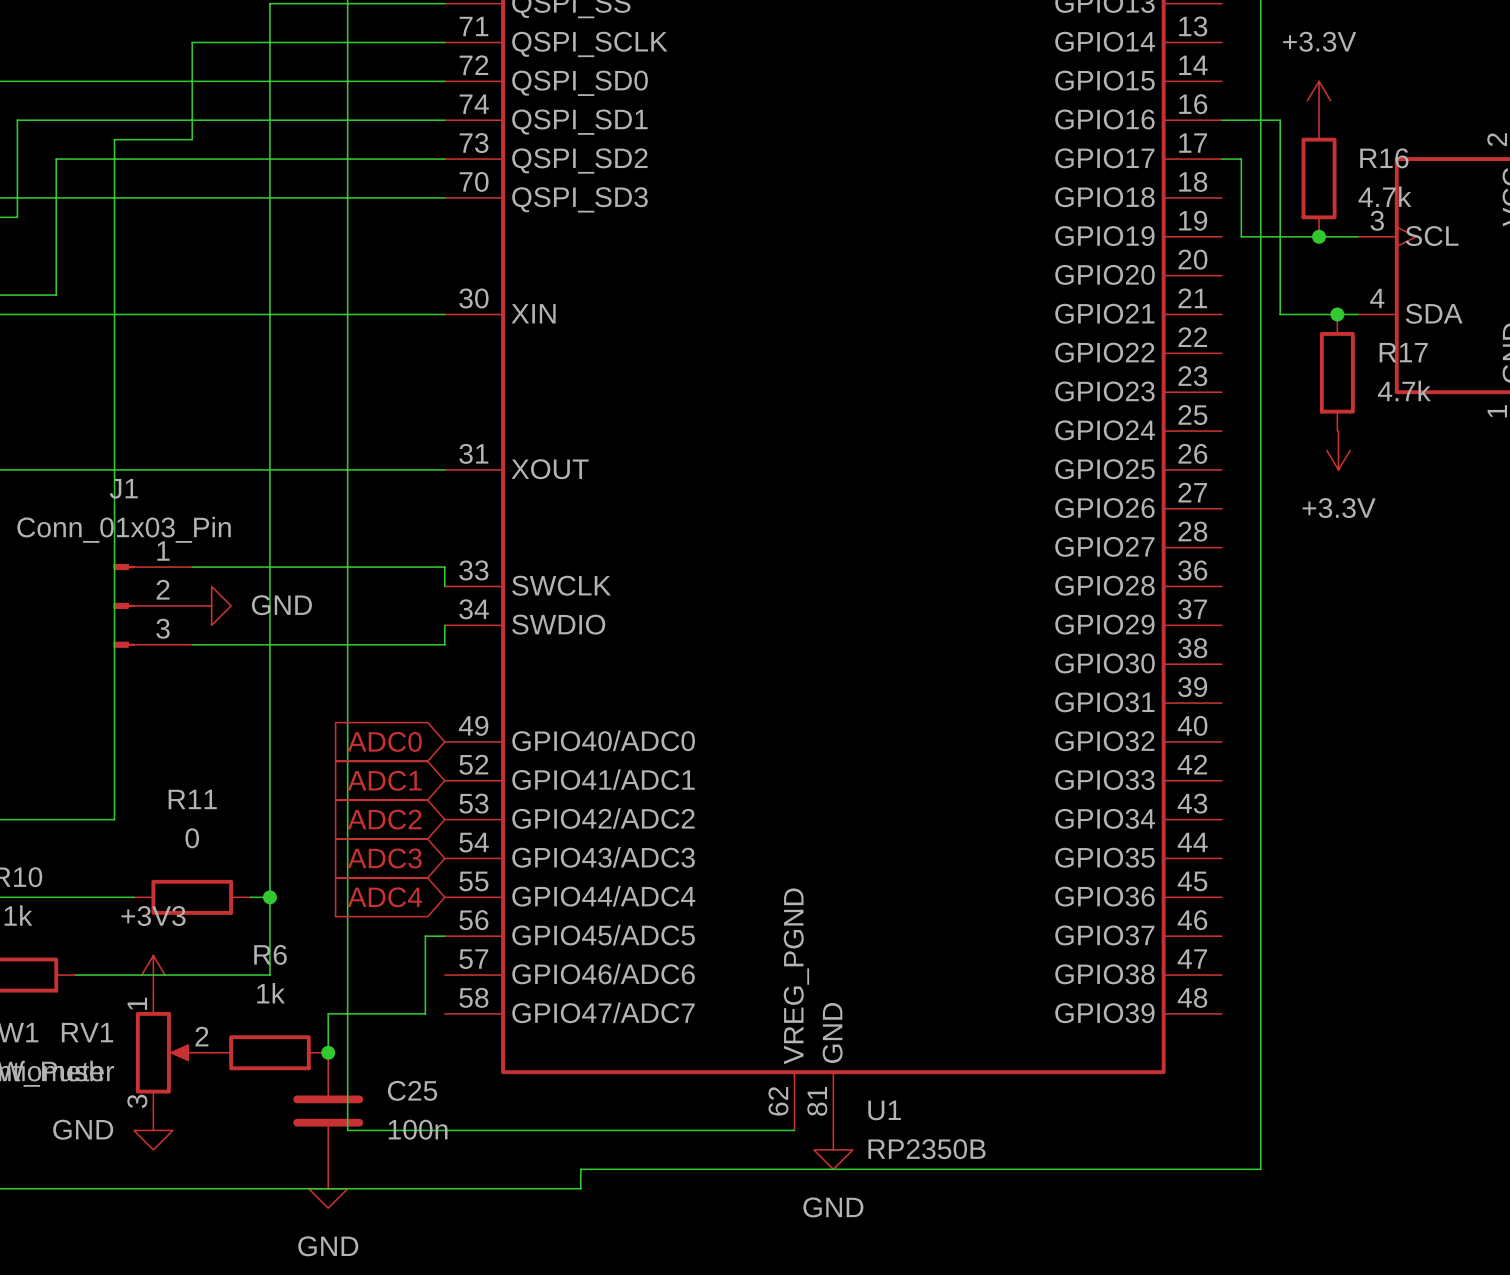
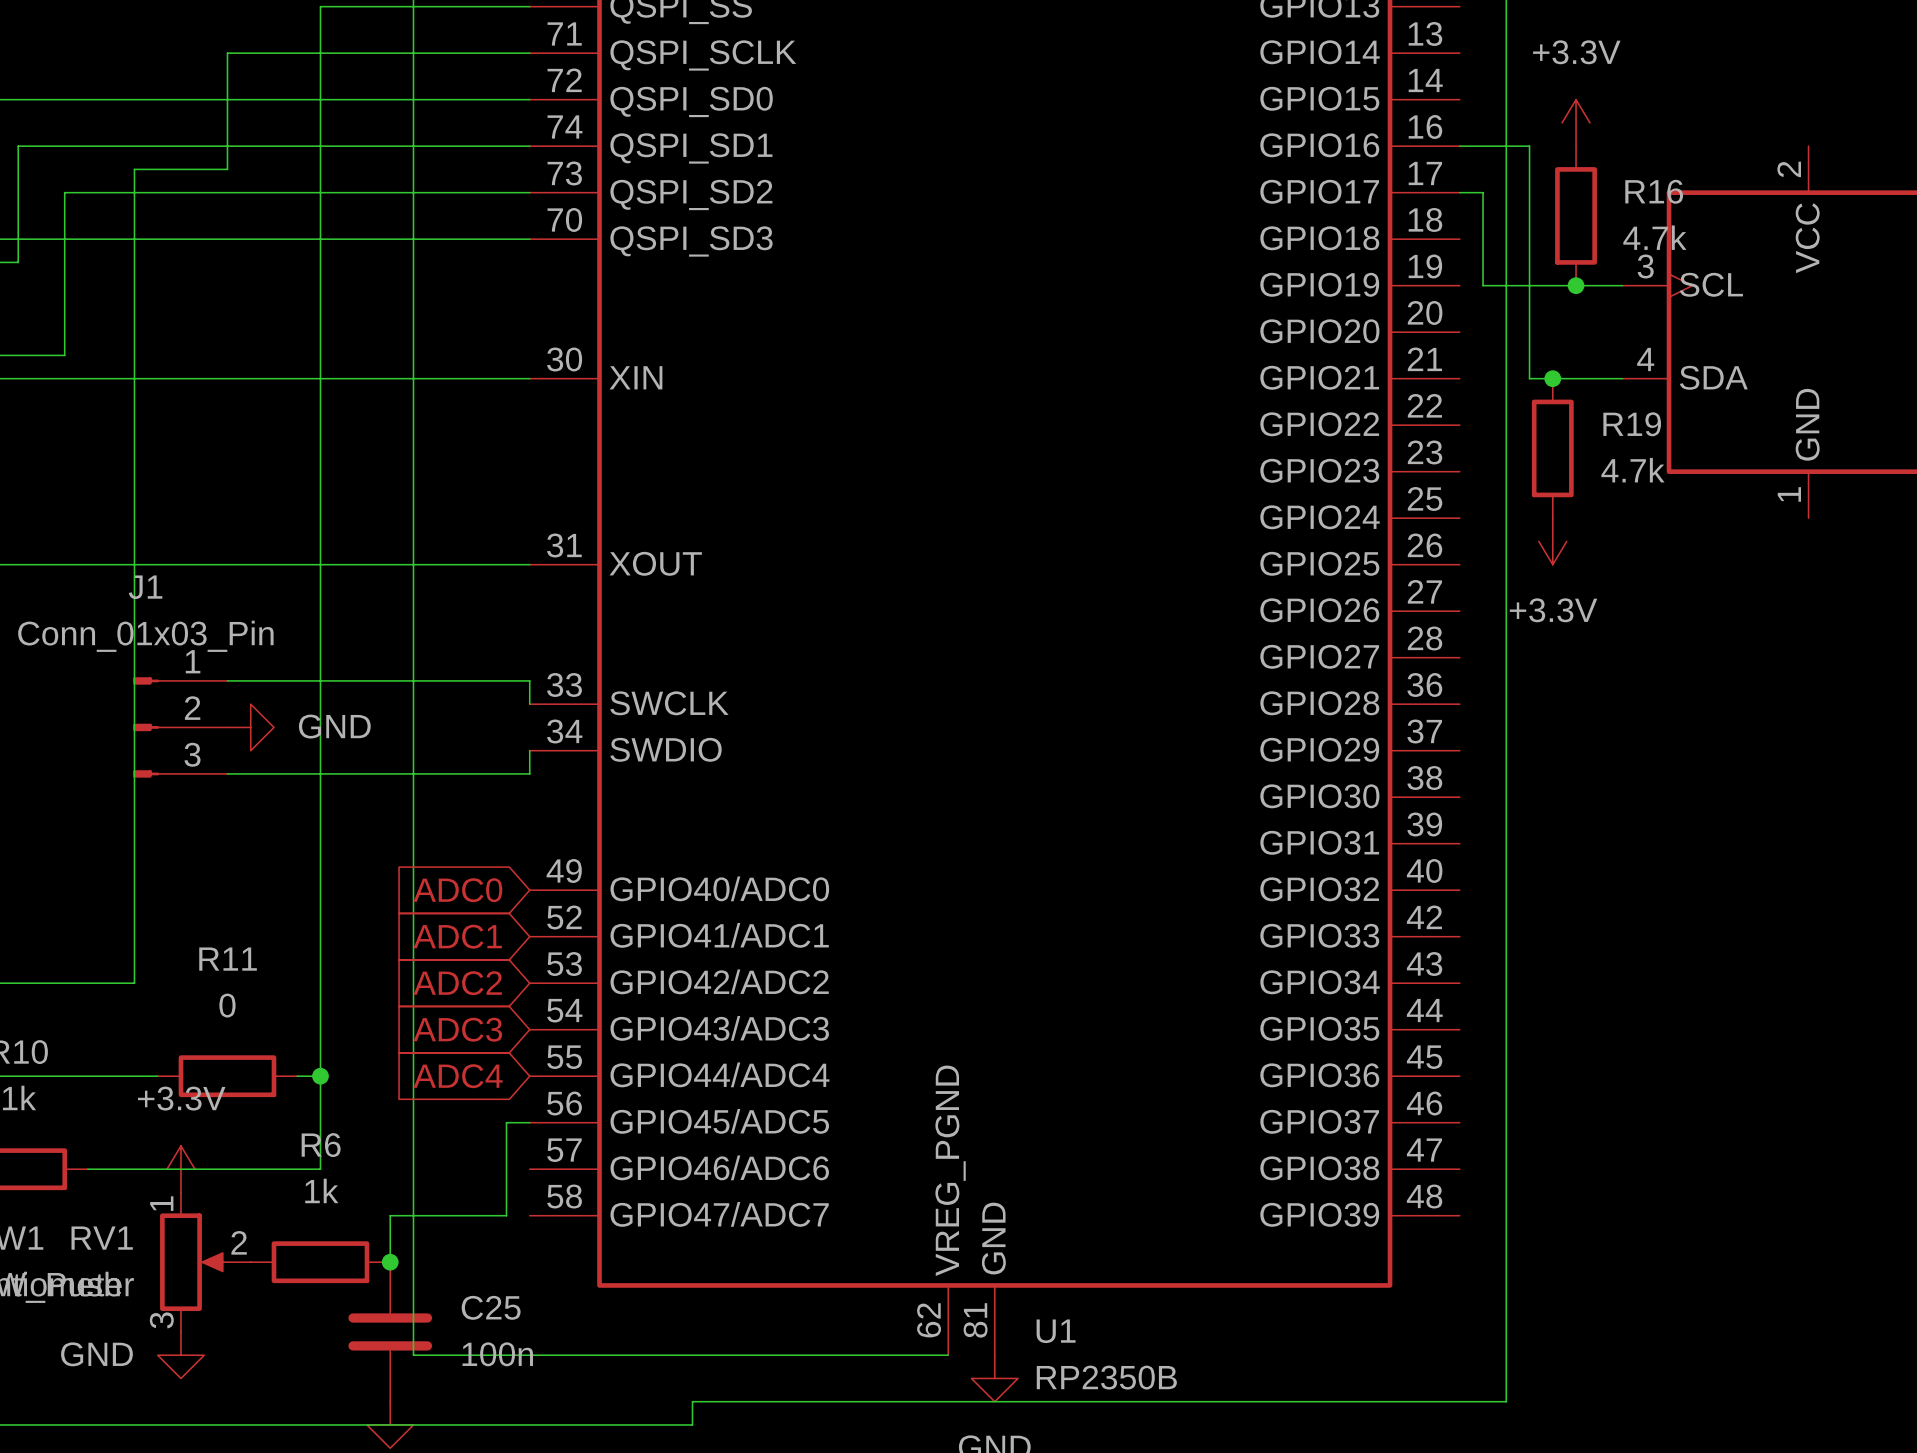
junction position: (1337, 314) -> (1552, 378)
R19: none -> 4.7k (1552, 448)
R17: 4.7k (1337, 372) -> none
power symbol position: +3.3V (1338, 450) -> +3.3V (1552, 541)
power symbol: +3V3 (153, 975) -> +3.3V (180, 1169)

